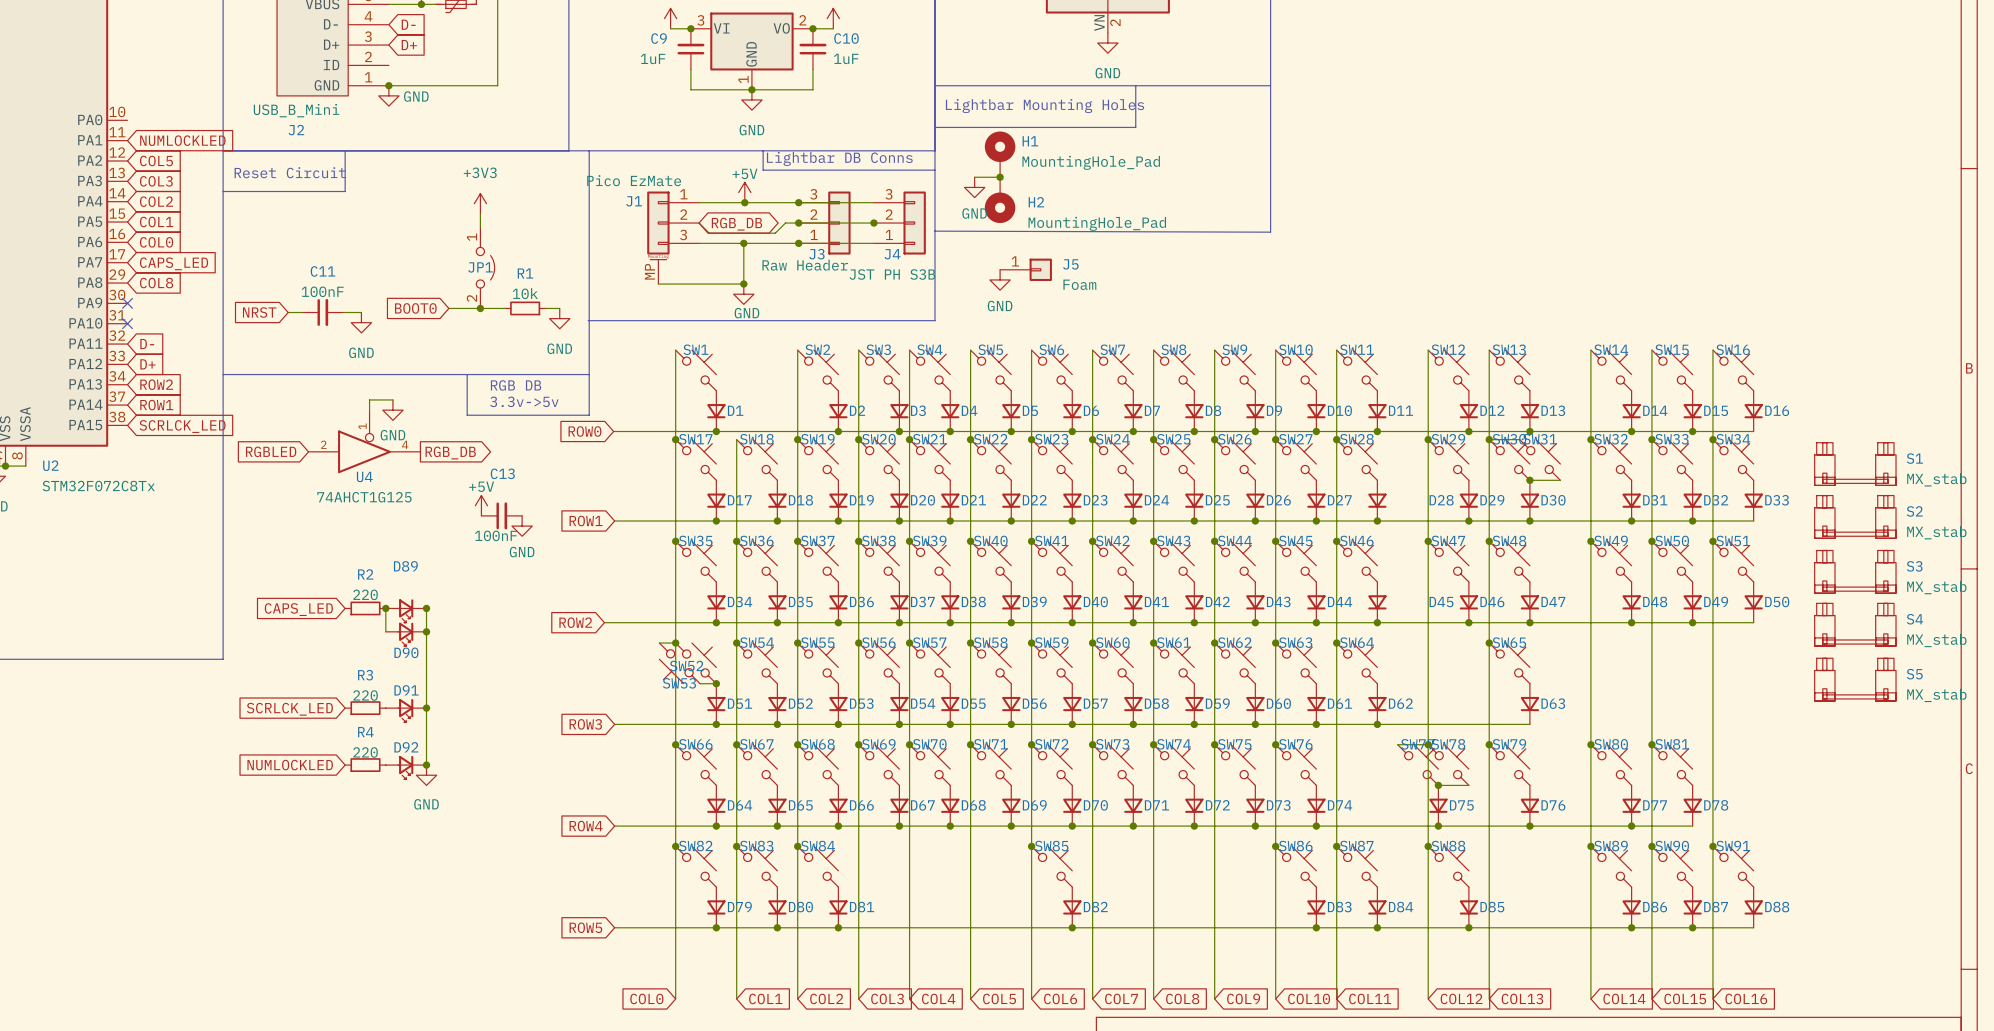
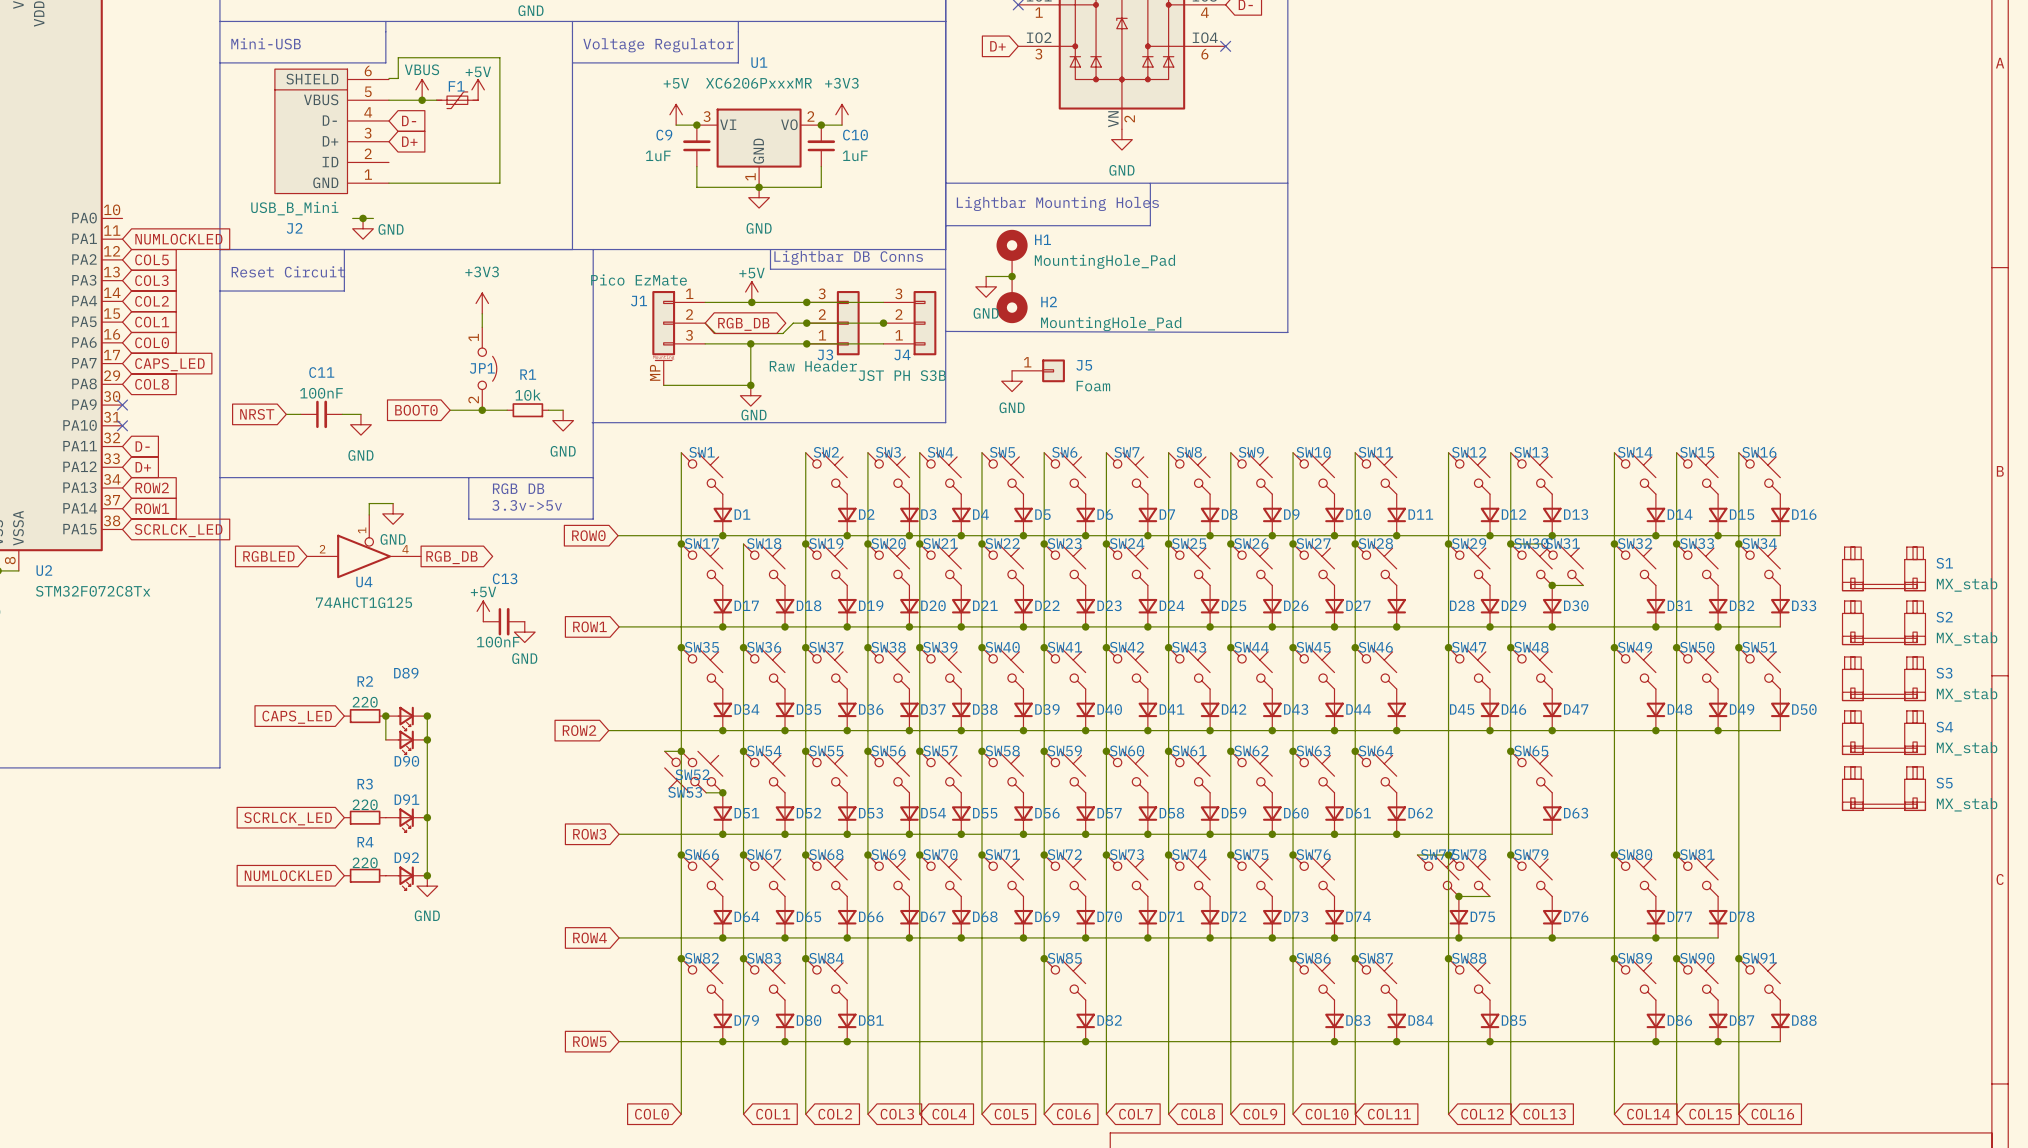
junction position: (388, 85) -> (363, 218)
power symbol position: GND (388, 95) -> GND (363, 228)
wire: none -> (352, 218) (373, 218)

